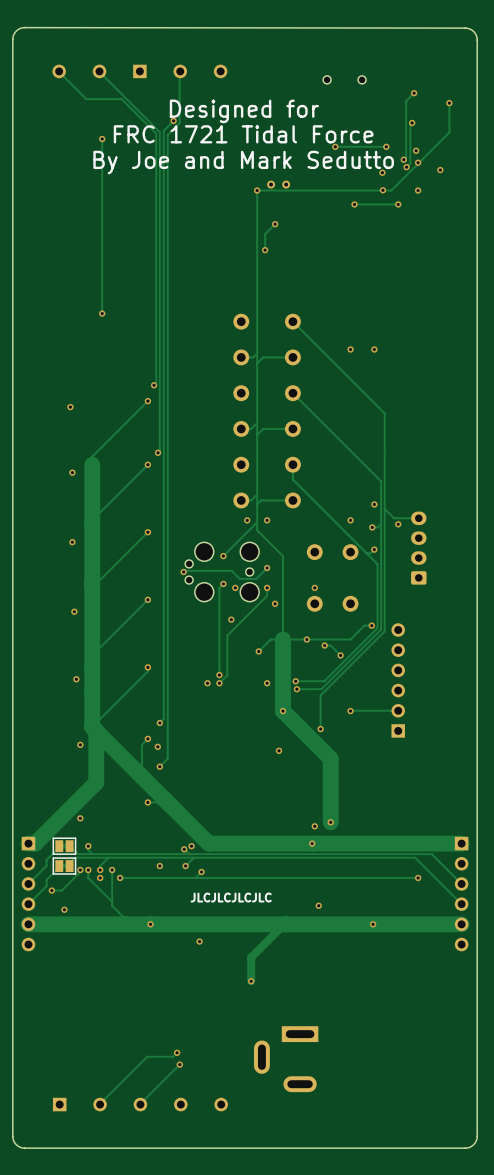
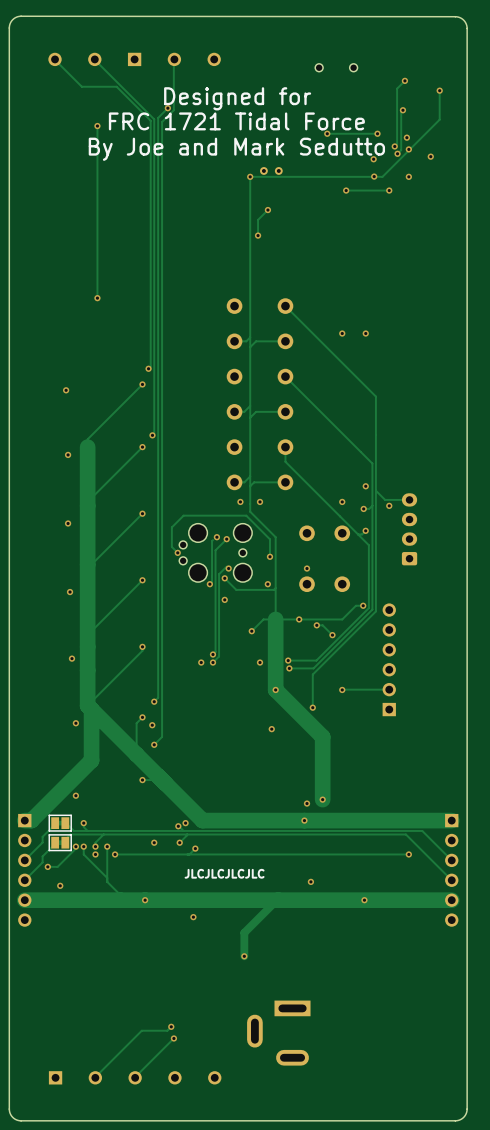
track: (257, 522) (223, 556) -> none
via: none -> (226, 539)
track: none -> (213, 540) (212, 582) (209, 584)
track: (267, 568) (256, 578) (239, 578) (231, 570) (183, 572) -> (269, 556) (269, 539) (246, 515) (183, 515) (171, 527) (171, 546) (177, 552)
via: (267, 568) -> none
via: none -> (269, 556)
track: (223, 583) (219, 587) (219, 675) -> (226, 539) (215, 550) (215, 651) (213, 654)
via: (223, 583) -> none
track: (267, 587) (267, 595) (227, 635) (227, 675) (225, 677) -> (226, 566) (219, 574) (219, 656)
via: (267, 587) -> none
track: none -> (224, 578) (236, 589) (273, 589) (275, 588)
via: none -> (224, 578)
via: none -> (209, 584)

